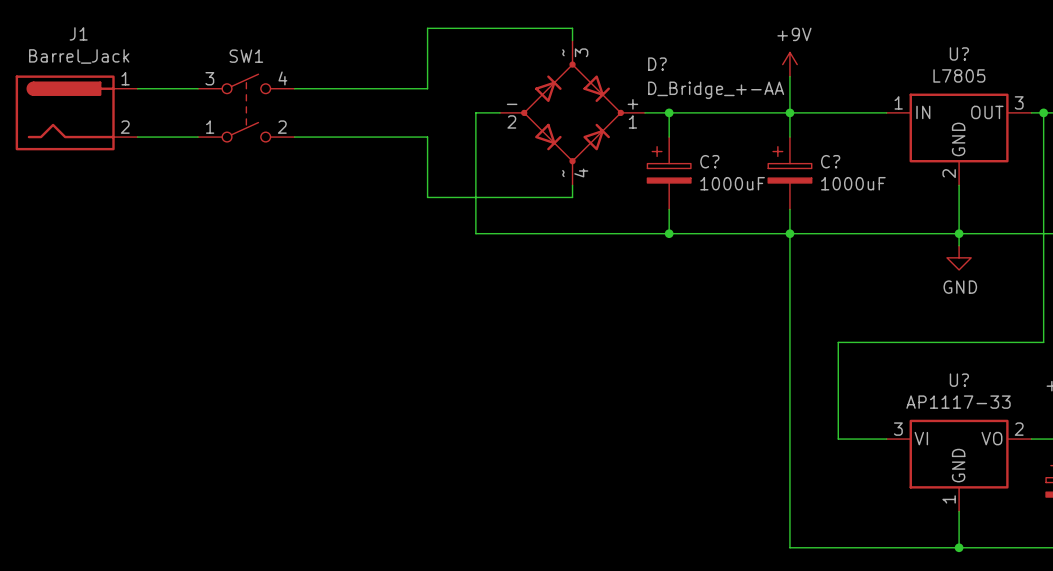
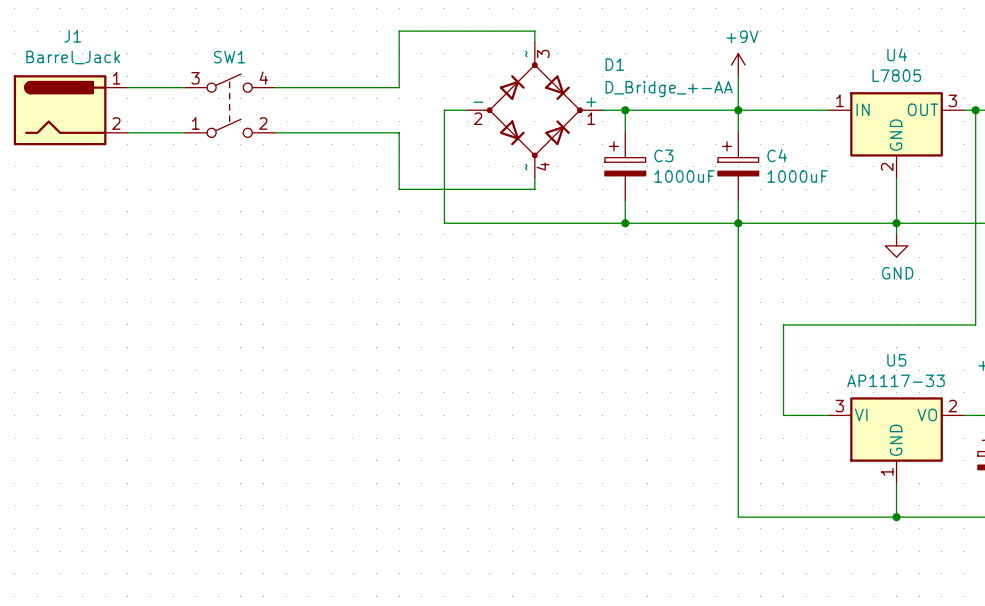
U? name: U? (959, 53) -> U4 (897, 54)
D? name: D? (657, 64) -> D1 (614, 64)
C? name: C? (709, 161) -> C3 (663, 155)
C? name: C? (830, 161) -> C4 (777, 155)
U? name: U? (959, 380) -> U5 (896, 360)

